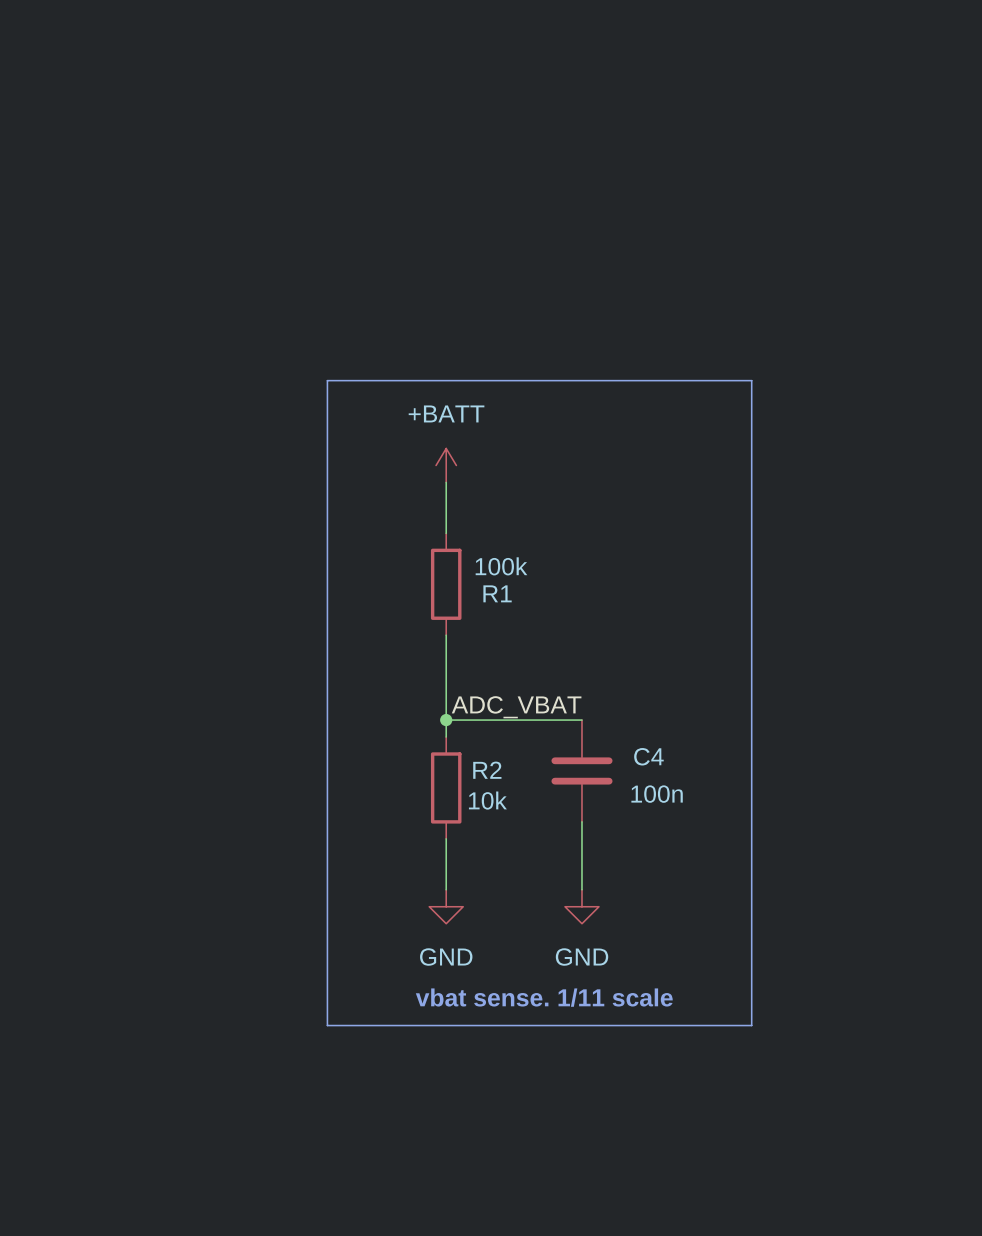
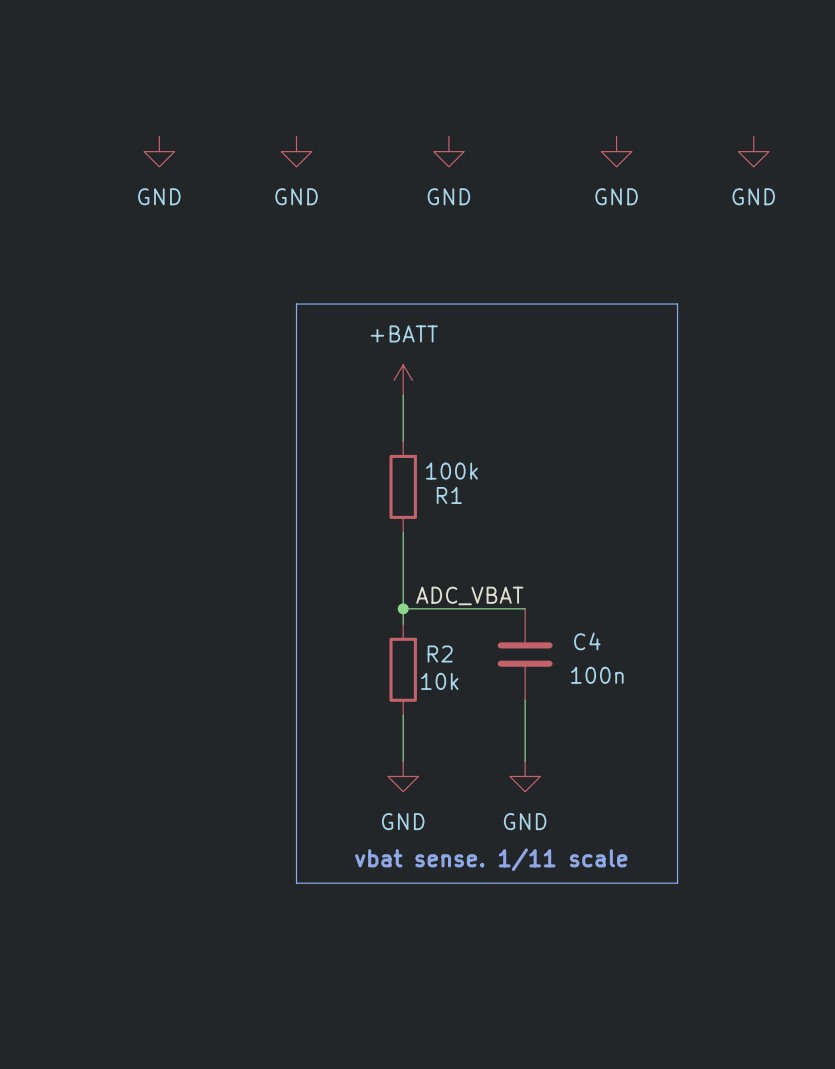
power symbol: none -> GND (159, 151)
power symbol: none -> GND (296, 151)
power symbol: none -> GND (448, 151)
power symbol: none -> GND (616, 151)
power symbol: none -> GND (753, 151)

